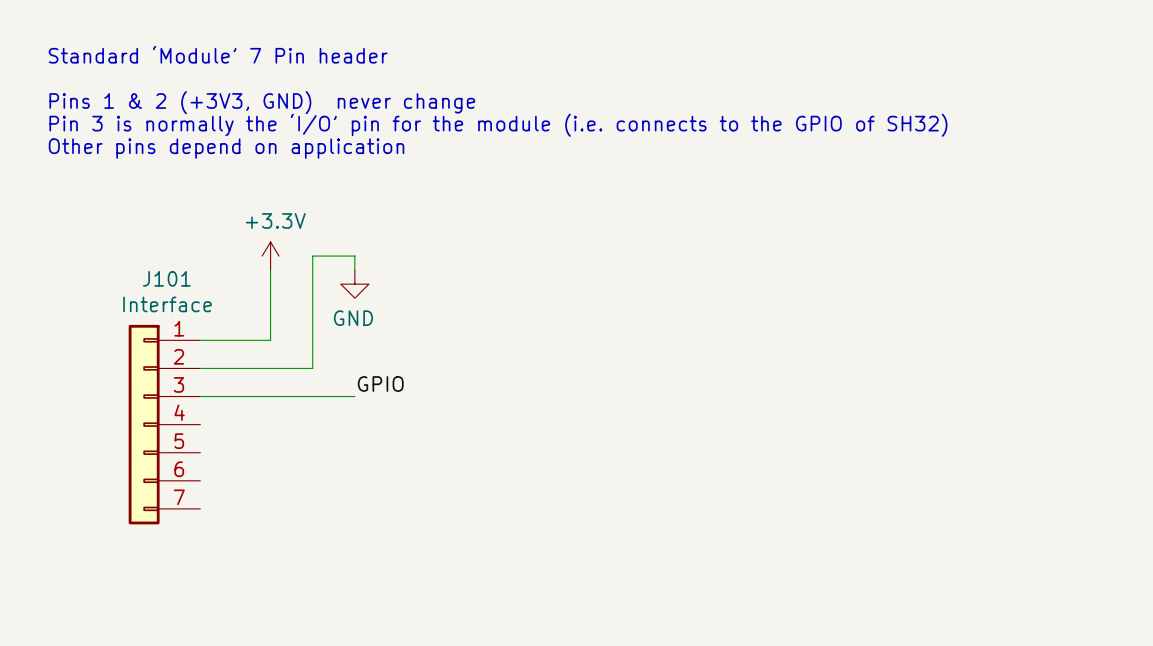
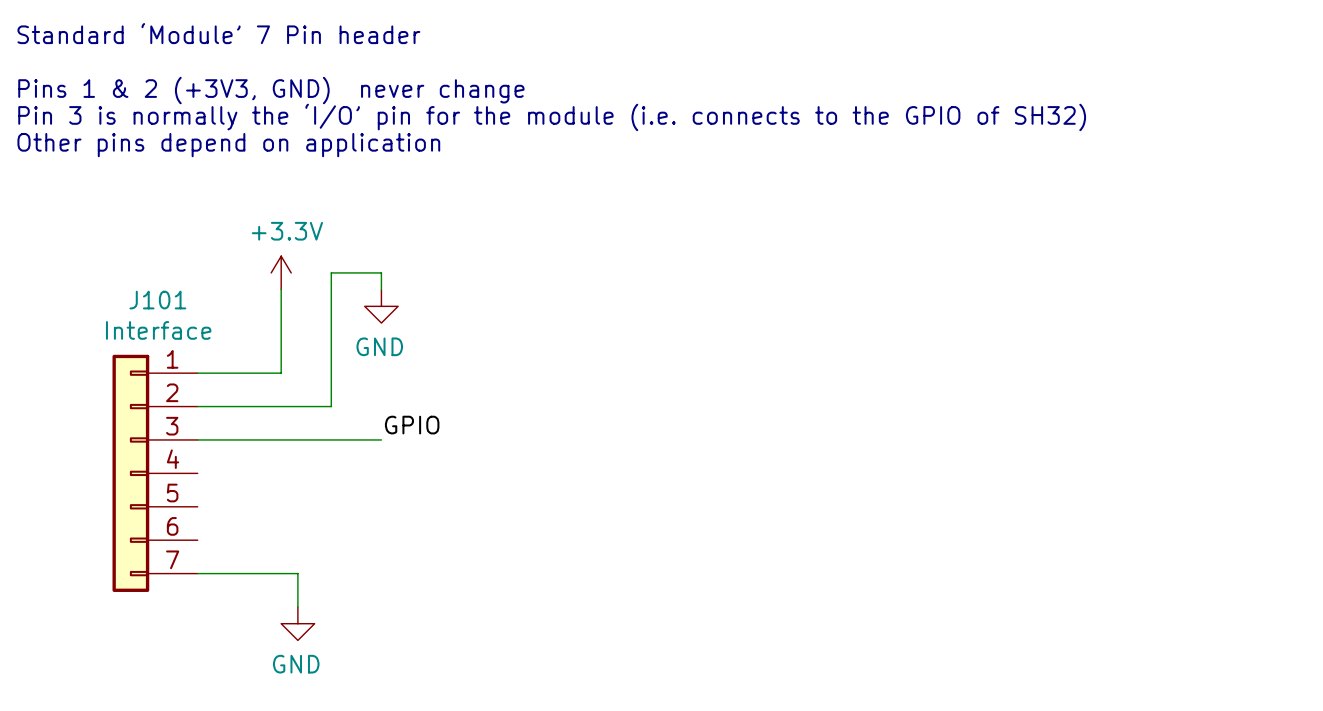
wire: none -> (197, 573) (297, 573) (297, 607)
power symbol: none -> GND (297, 623)

